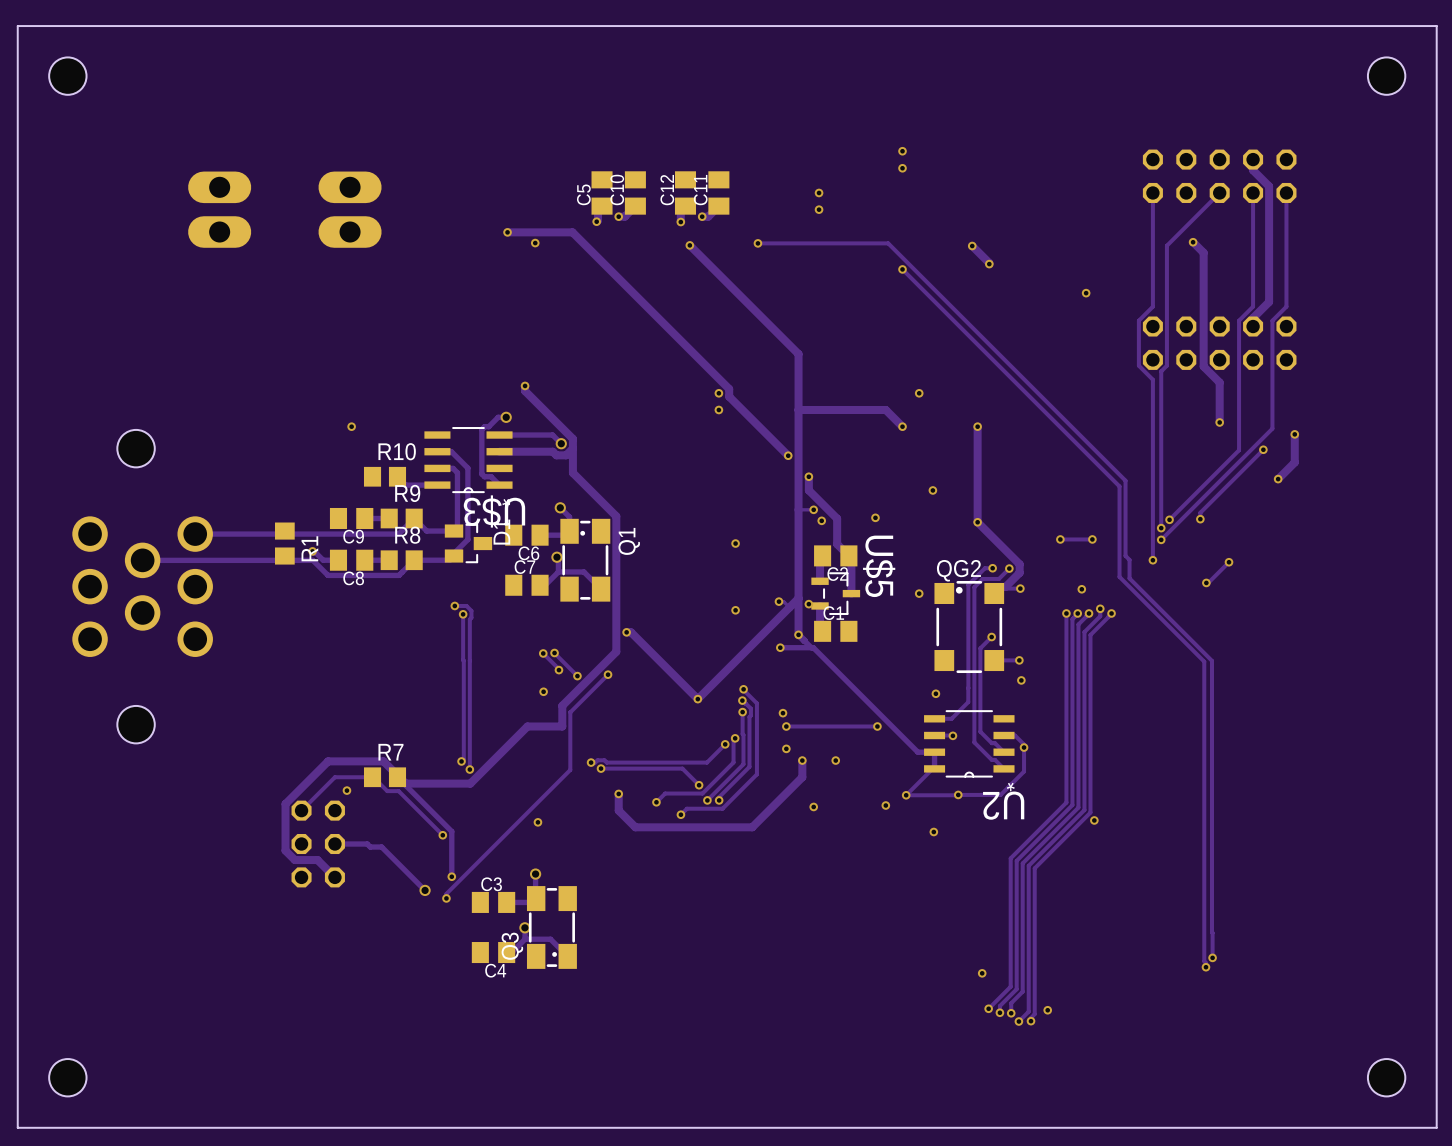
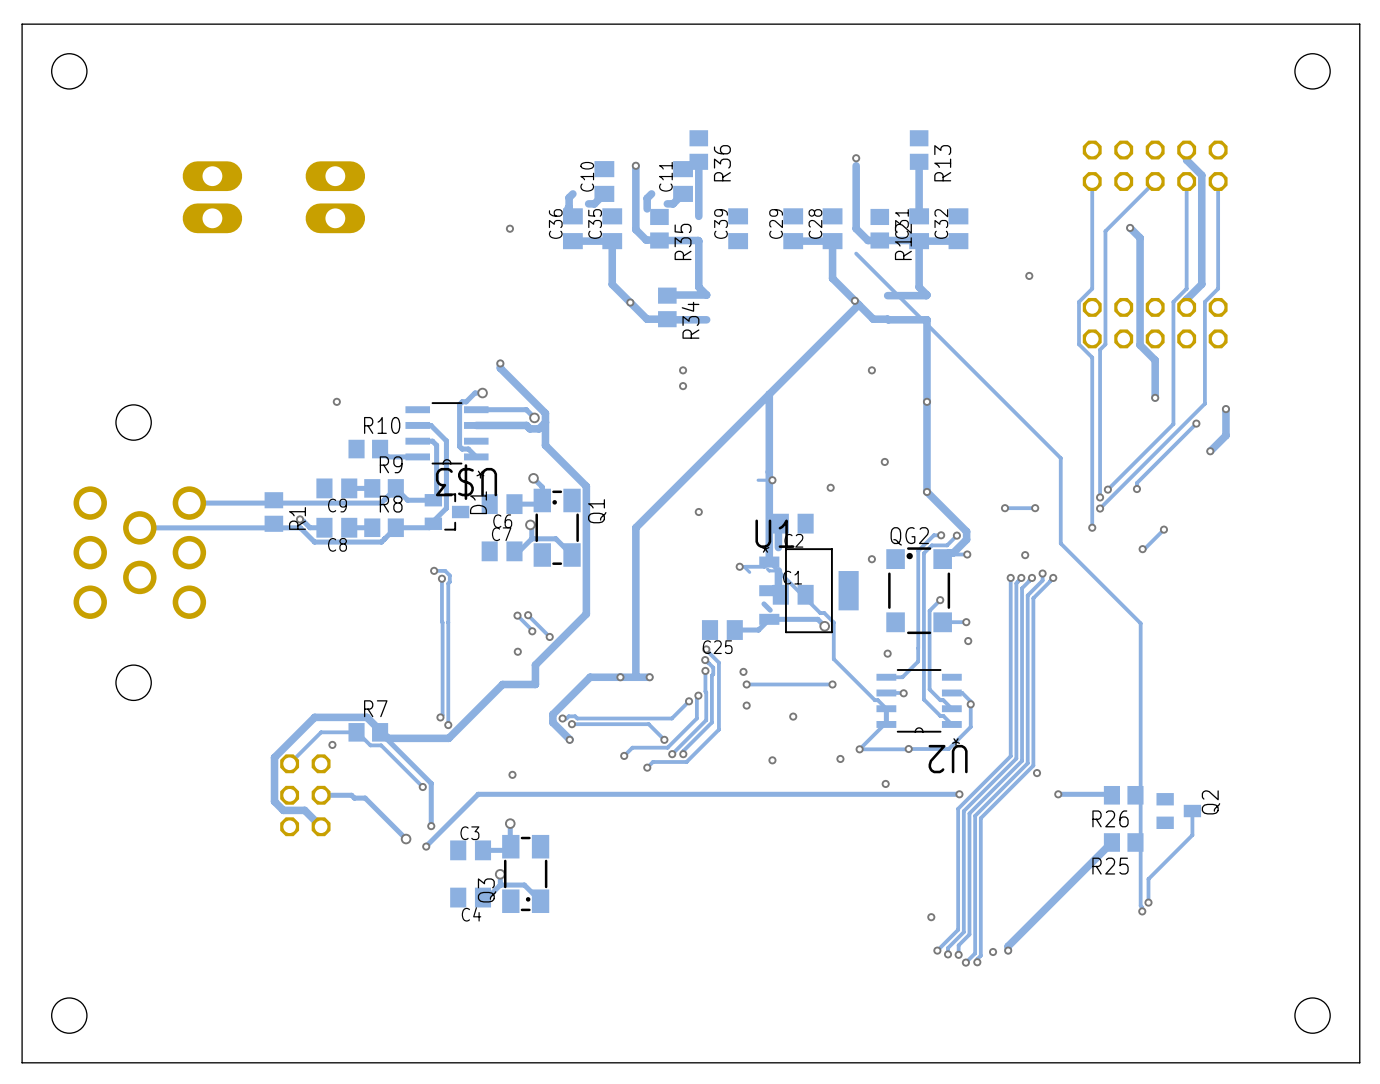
via: (902, 151) -> none
R36: none -> (698, 150)
R13: none -> (919, 150)
track: none -> (698, 161) (698, 216)
track: none -> (919, 161) (919, 216)
track: none -> (635, 165) (635, 229) (646, 240) (698, 241) (698, 287) (706, 295) (667, 295)
via: none -> (635, 165)
track: none -> (856, 165) (856, 228) (867, 240) (919, 241)
C5: (602, 192) -> none
C12: (685, 192) -> none
via: (819, 192) -> none
via: (819, 209) -> none
via: (618, 216) -> none
via: (702, 216) -> none
via: (596, 221) -> none
via: (680, 222) -> none
track: (507, 232) (572, 232) (729, 389) (729, 396) (788, 455) -> none
via: (507, 232) -> none
C36: none -> (572, 228)
C35: none -> (612, 228)
R35: none -> (659, 228)
track: (757, 243) (888, 243) (1125, 480) (1125, 555) (1129, 559) (1129, 578) (1212, 660) (1212, 932) -> (1192, 811) (1192, 835) (1148, 879)
via: (757, 243) -> none
C39: none -> (738, 228)
C29: none -> (793, 228)
C28: none -> (832, 228)
R12: none -> (879, 228)
C31: none -> (919, 228)
C32: none -> (958, 228)
track: (689, 245) (798, 354) (798, 634) (804, 640) -> none
via: (689, 245) -> none
track: (972, 246) (989, 264) -> none
via: (972, 246) -> none
track: none -> (572, 241) (612, 241) (612, 284) (646, 319) (706, 319)
track: none -> (793, 241) (832, 241) (832, 278) (873, 319) (926, 319) (926, 401)
track: none -> (919, 241) (919, 287) (926, 295) (887, 295)
track: none -> (958, 241) (919, 241)
via: (989, 264) -> none
via position: (902, 269) -> (854, 300)
via: none -> (630, 302)
track: none -> (858, 304) (635, 527) (635, 677)
R34: none -> (667, 307)
track: (798, 409) (885, 409) (902, 426) -> none
track: none -> (769, 394) (769, 562)
via: (902, 426) -> none
via: (788, 455) -> none
track: (808, 476) (808, 490) (837, 518) (837, 544) (851, 558) (851, 593) -> none
via: (808, 476) -> none
via: (821, 520) -> none
U$5: (835, 593) -> none
track: none -> (769, 562) (764, 566) (745, 566)
track: (798, 598) (697, 699) (631, 632) (626, 632) -> none
via: (808, 604) -> none
via: (735, 610) -> none
U1: none -> (808, 590)
via: (626, 632) -> none
via: (798, 634) -> none
track: (780, 647) (813, 647) (917, 752) (934, 752) -> (769, 562) (820, 613) (824, 613) (833, 622) (833, 659) (874, 700) (877, 700) (886, 708)
via: (780, 647) -> none
track: none -> (824, 626) (817, 619) (769, 619) (758, 630) (734, 630)
via: none -> (824, 626)
C25: none -> (722, 630)
track: (608, 674) (570, 712) -> none
via: (608, 674) -> none
via position: (697, 699) -> (649, 677)
track: (570, 712) (570, 769) (446, 893) (446, 898) -> (959, 794) (478, 794) (426, 846)
via: none -> (620, 677)
track: none -> (649, 677) (590, 677) (552, 714) (552, 722) (569, 739)
track: (802, 760) (802, 777) (752, 827) (635, 827) (618, 810) (618, 793) -> none
via: (802, 760) -> none
via position: (618, 793) -> (569, 739)
via: none -> (959, 794)
track: none -> (1058, 794) (1111, 795)
via: none -> (1058, 794)
R26: none -> (1123, 795)
Q2: none -> (1178, 811)
track: none -> (1111, 842) (1008, 946) (1008, 950)
R25: none -> (1123, 842)
via: none -> (1008, 950)

